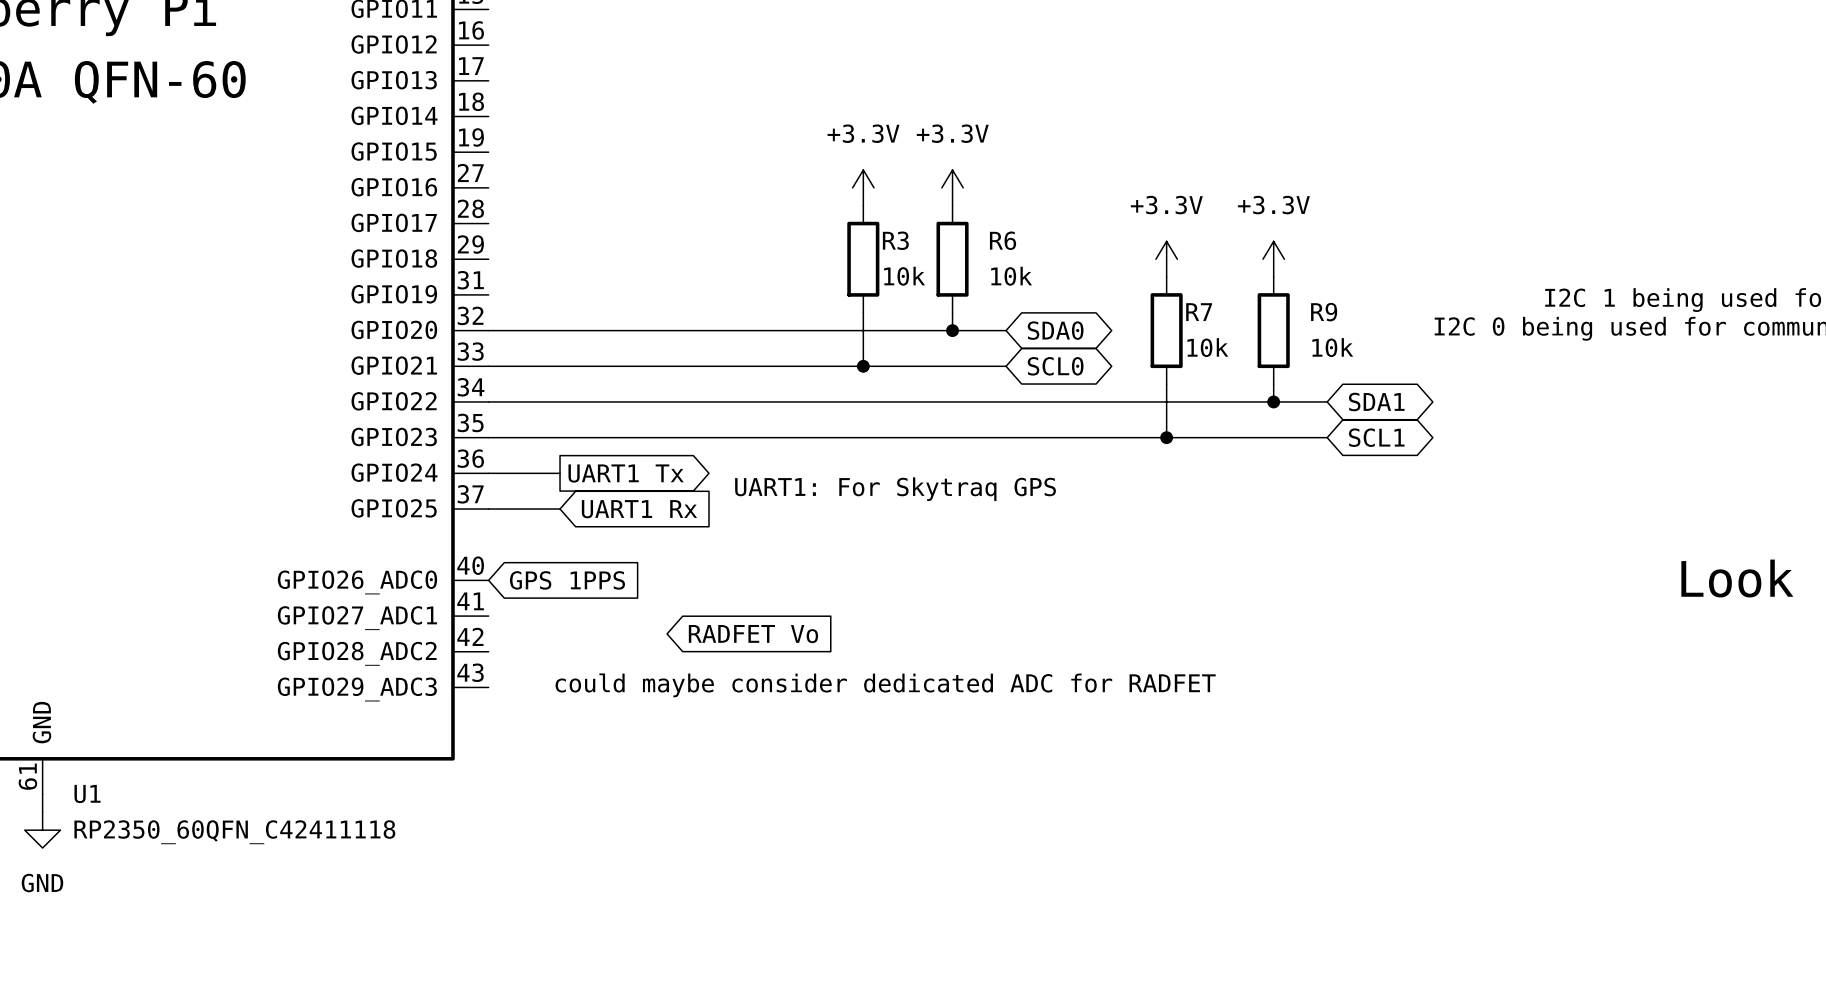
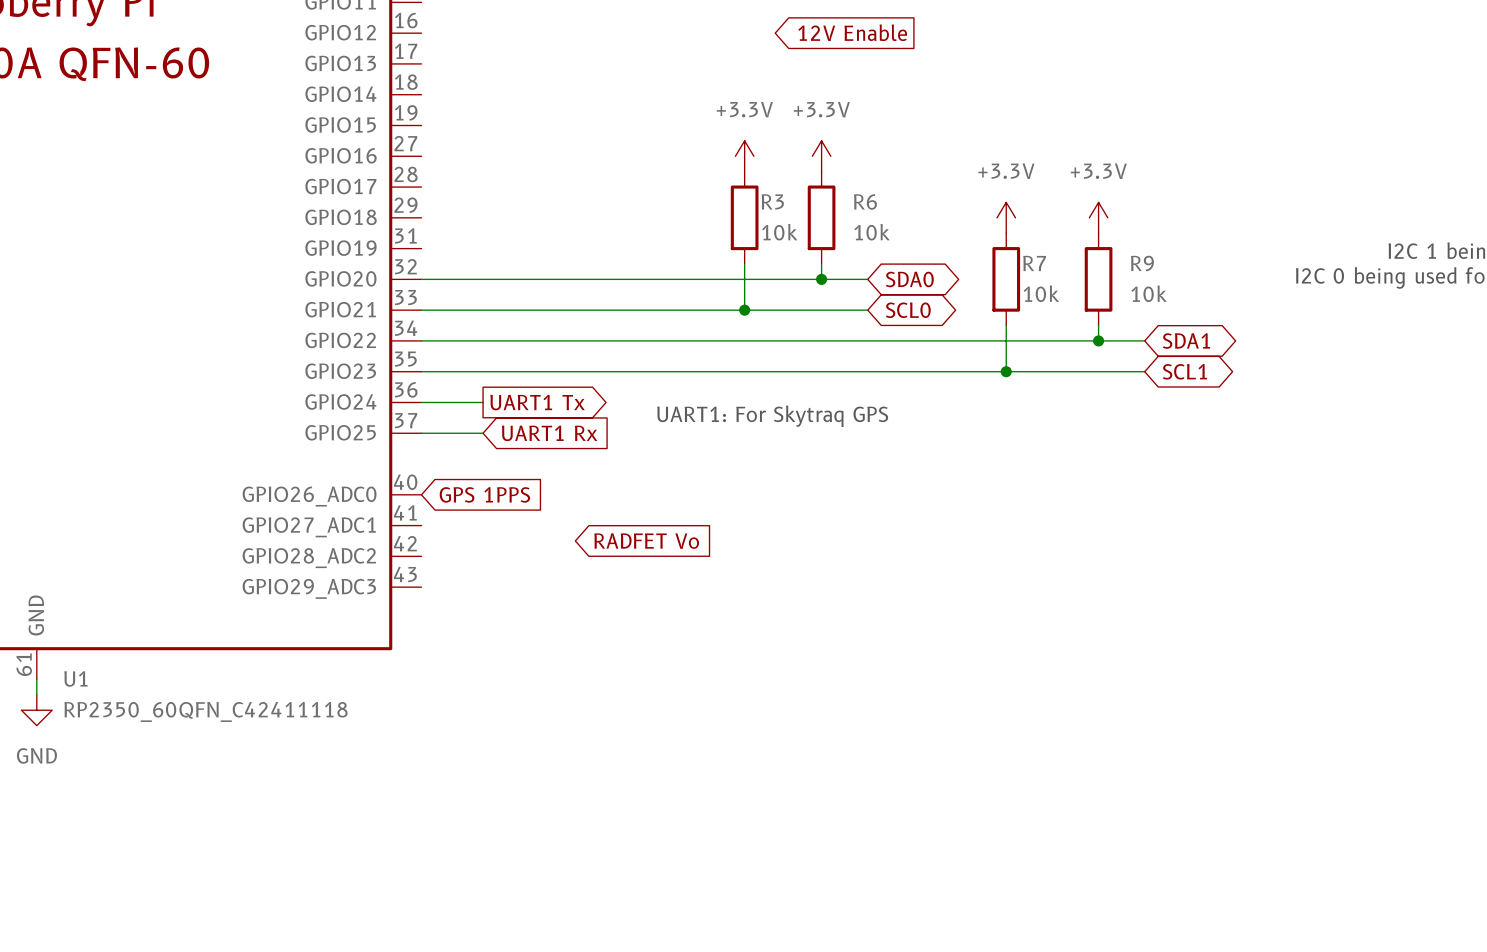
global label: none -> 12V Enable (852, 32)
text: could maybe consider dedicated ADC for RADFET (885, 685) -> none

